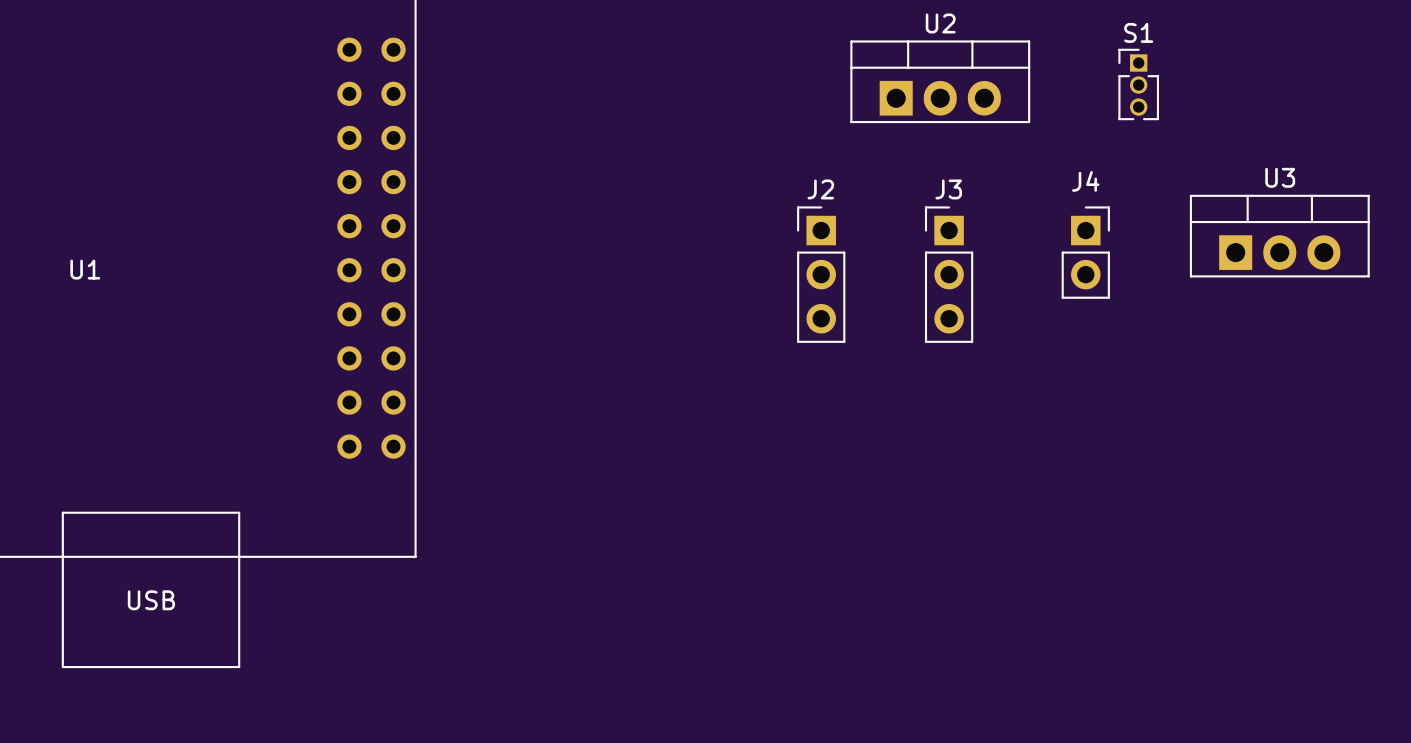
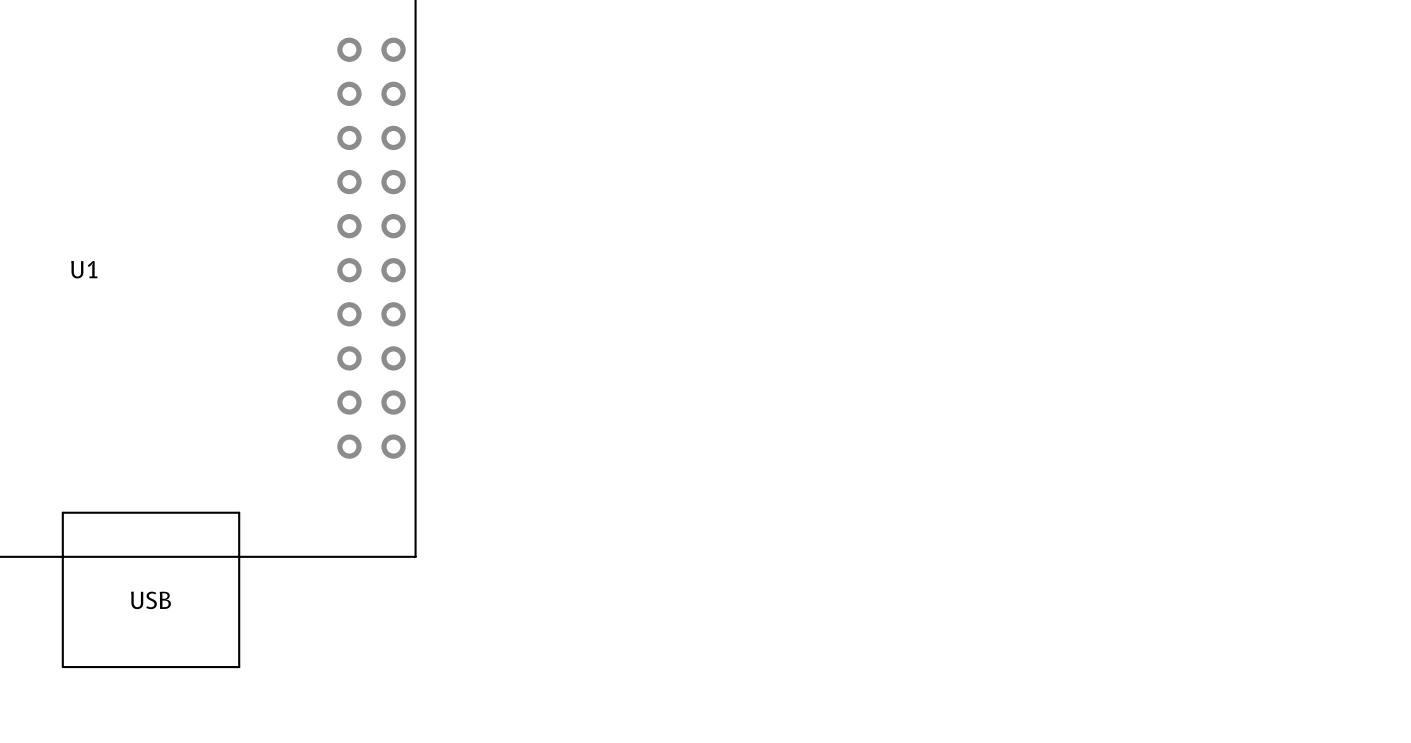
U2: (940, 81) -> none
S1: (1138, 84) -> none
U3: (1279, 236) -> none
J4: (1085, 252) -> none
J2: (821, 274) -> none
J3: (949, 274) -> none

